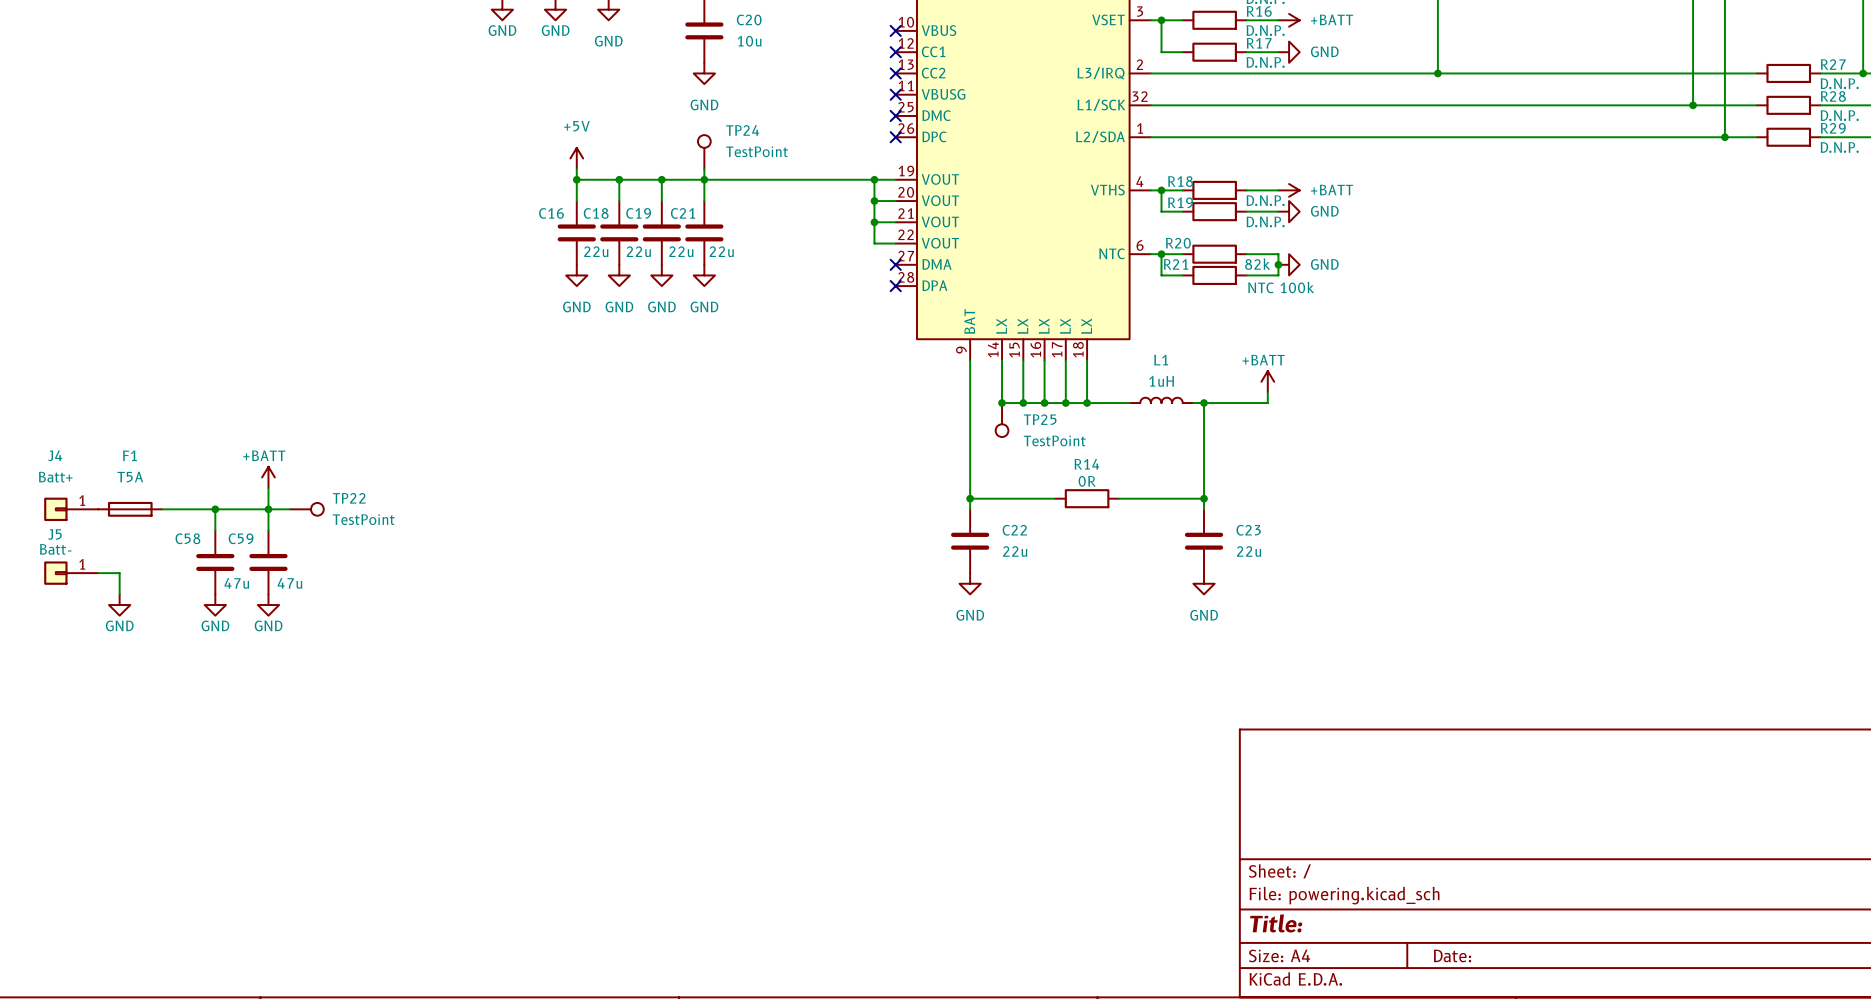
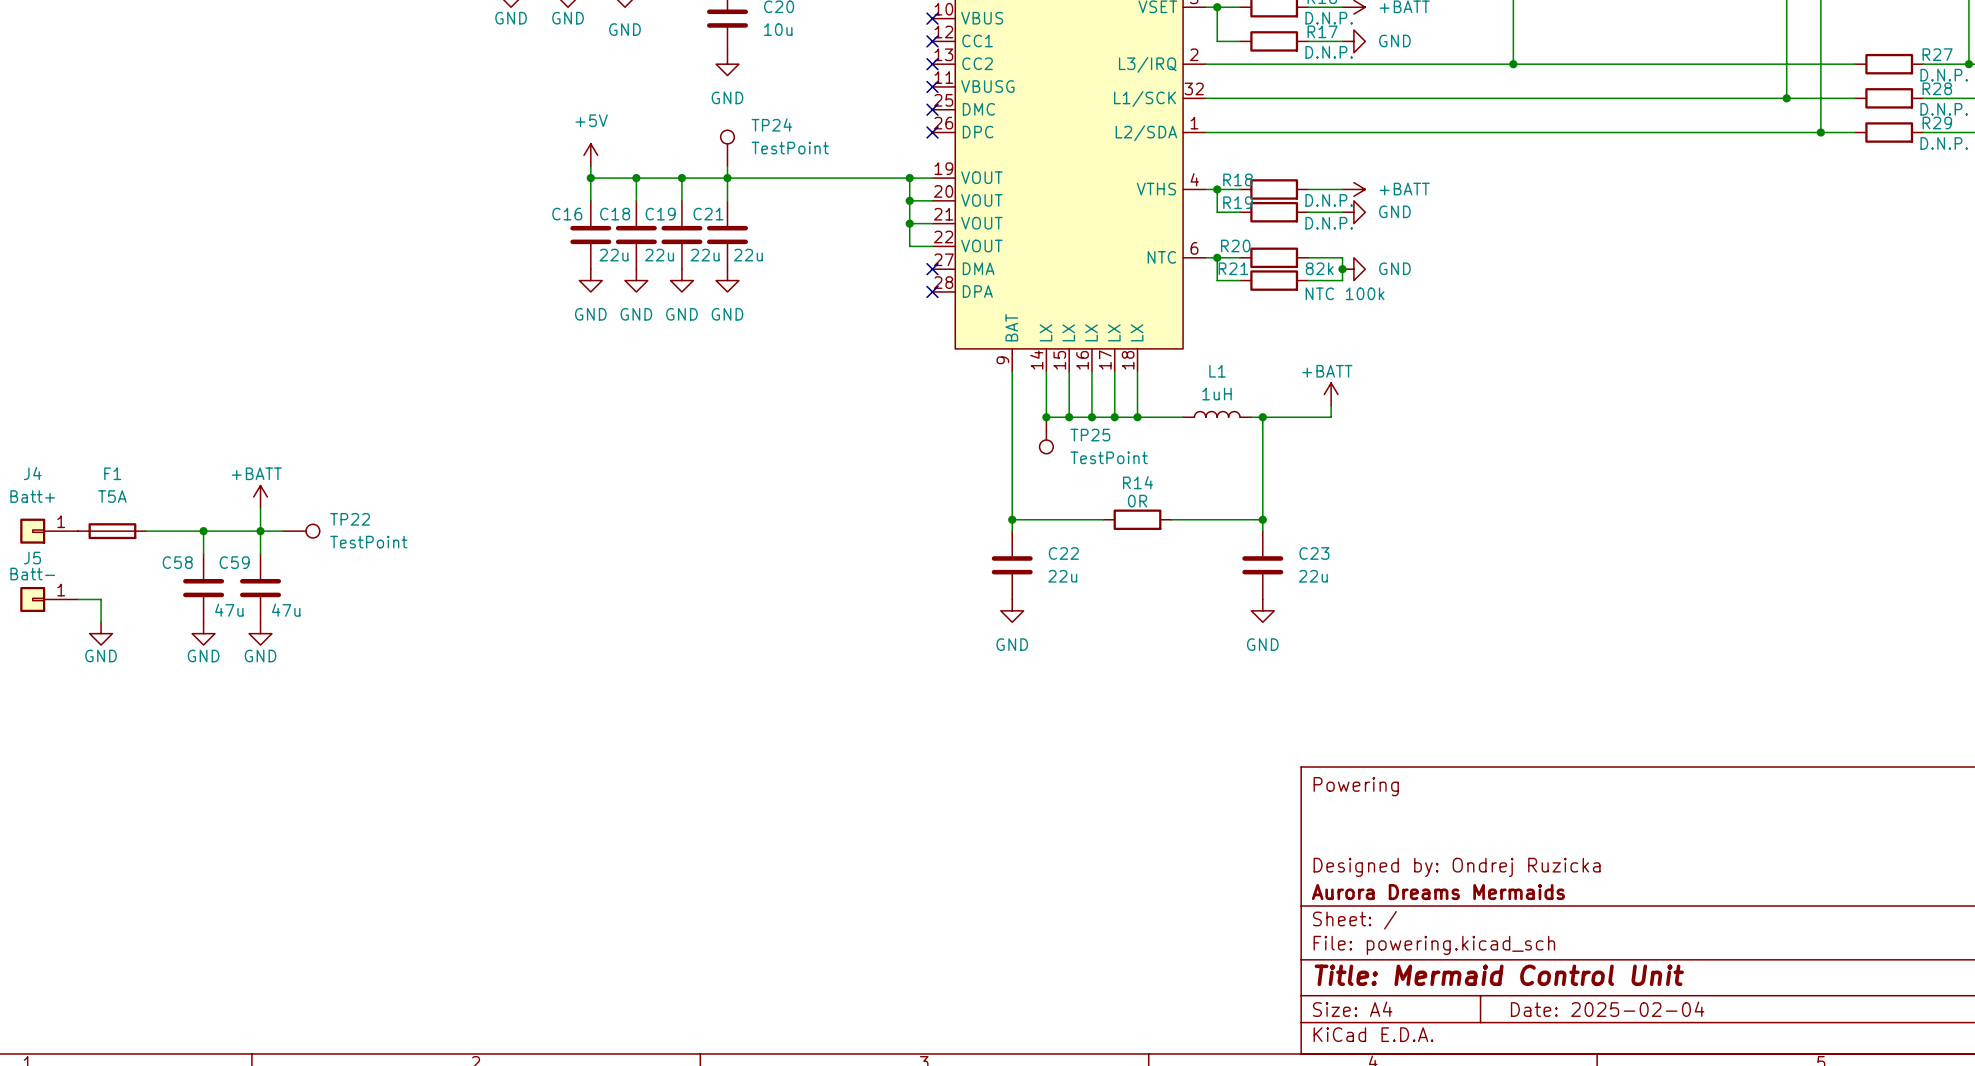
title block: none -> Powering (1356, 786)
title block: none -> Designed by: Ondrej Ruzicka (1457, 867)
title block: none -> Aurora Dreams Mermaids (1438, 892)
title block: Title: (1276, 923) -> Title: Mermaid Control Unit (1499, 975)
title block: Date: (1452, 955) -> Date: 2025-02-04 (1607, 1009)

